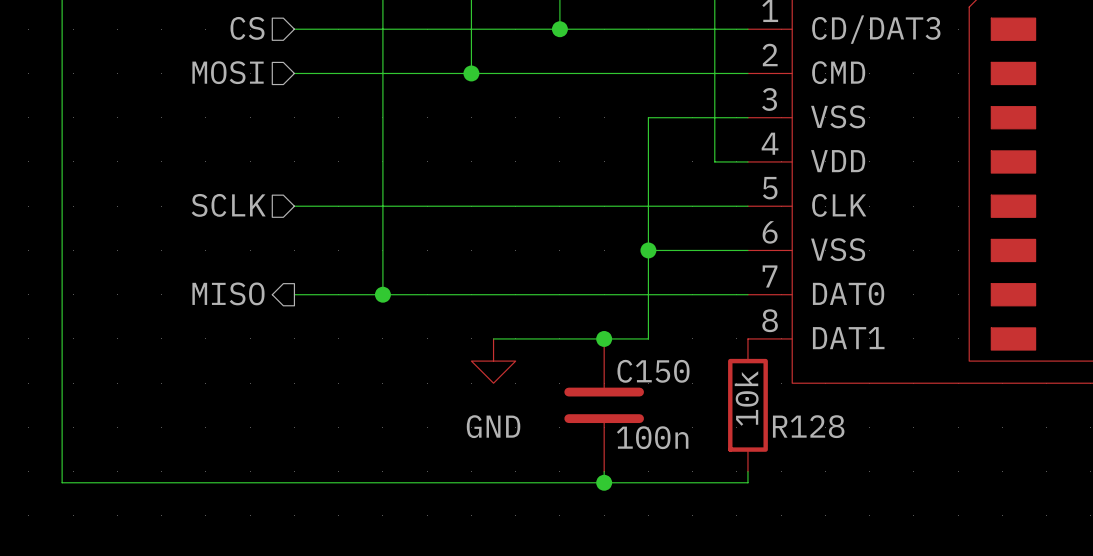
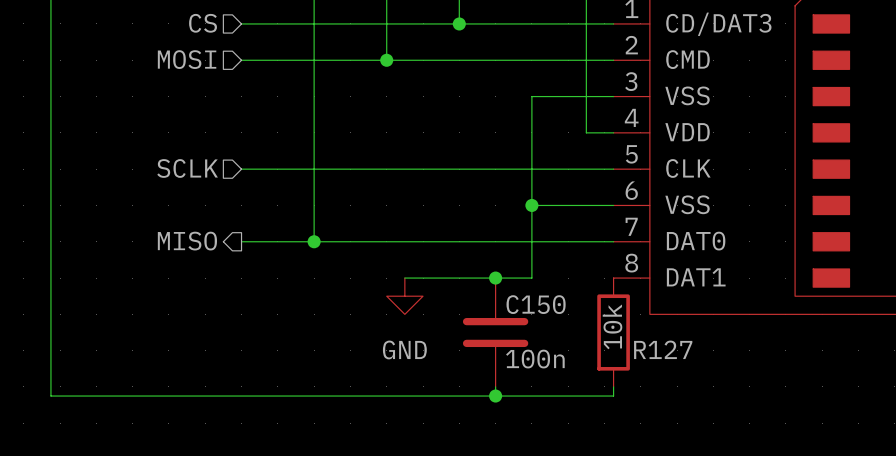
R128 name: R128 (808, 426) -> R127 (663, 349)

